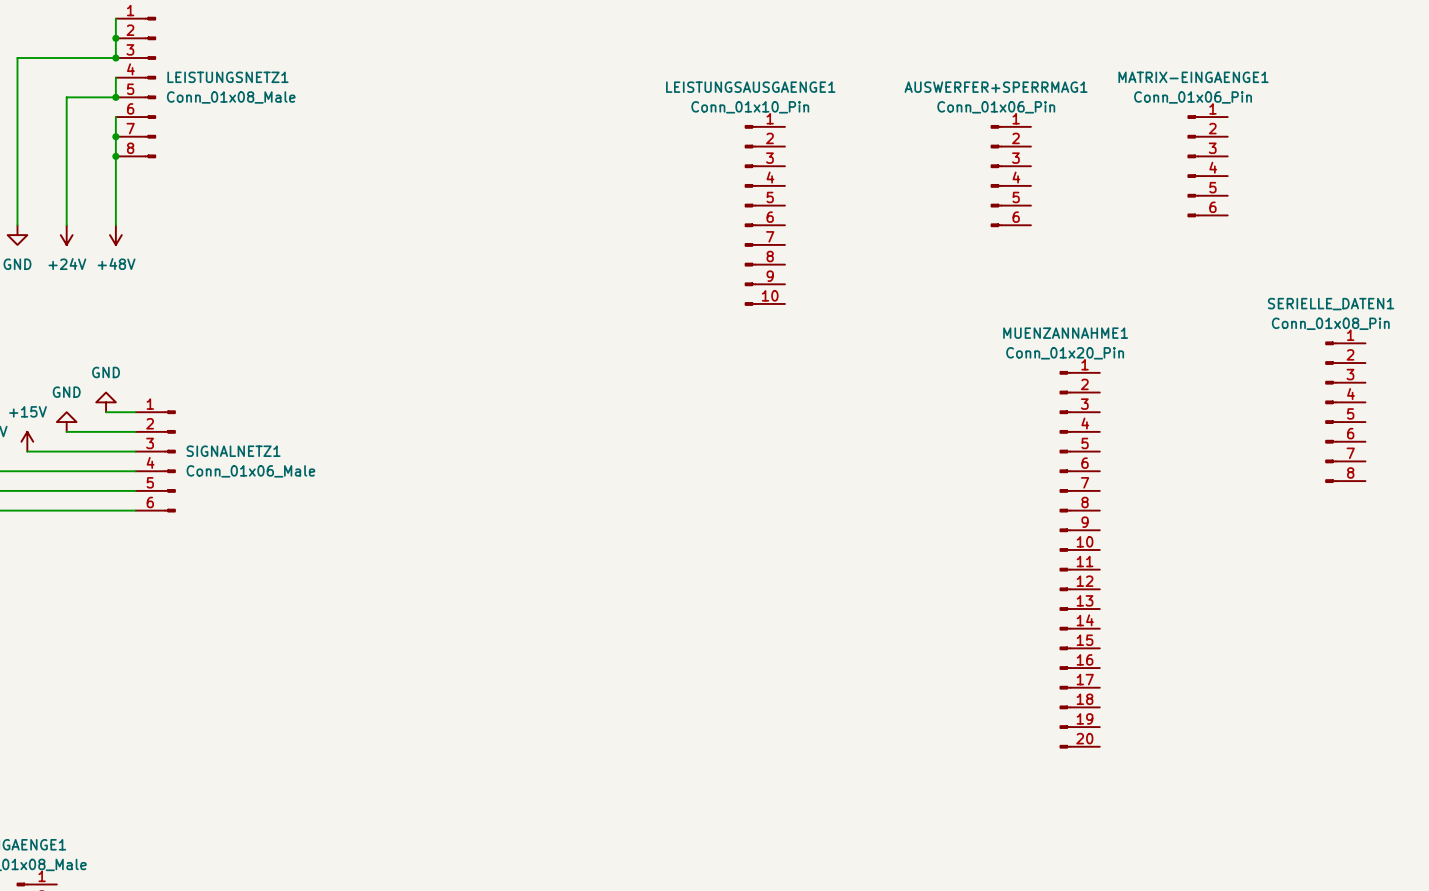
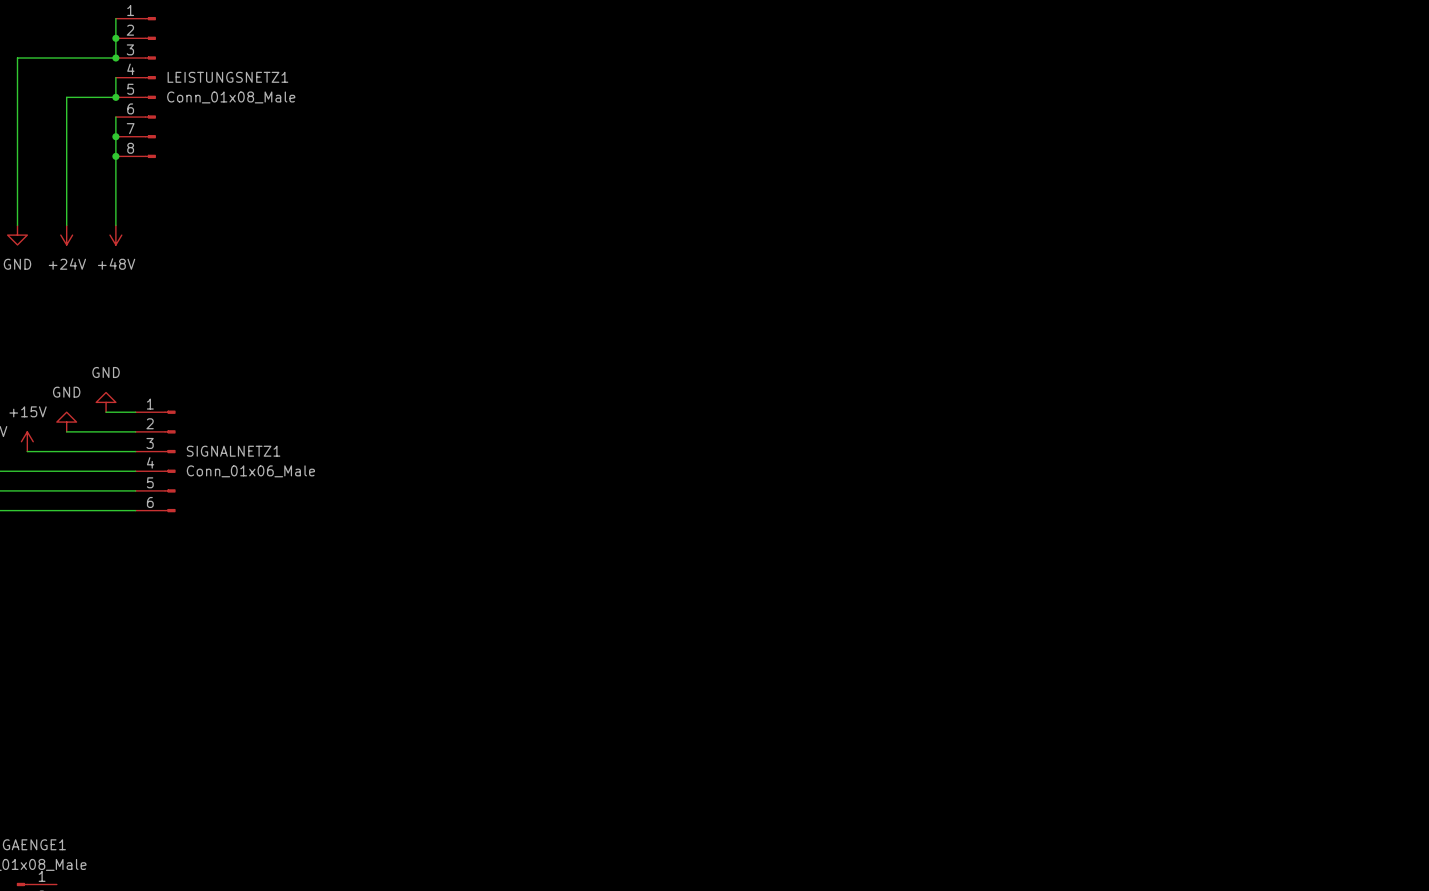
MATRIX-EINGAENGE1: Conn_01x06_Pin (1207, 166) -> none
AUSWERFER+SPERRMAG1: Conn_01x06_Pin (1010, 176) -> none
LEISTUNGSAUSGAENGE1: Conn_01x10_Pin (764, 215) -> none
SERIELLE_DATEN1: Conn_01x08_Pin (1345, 412) -> none
MUENZANNAHME1: Conn_01x20_Pin (1079, 559) -> none

